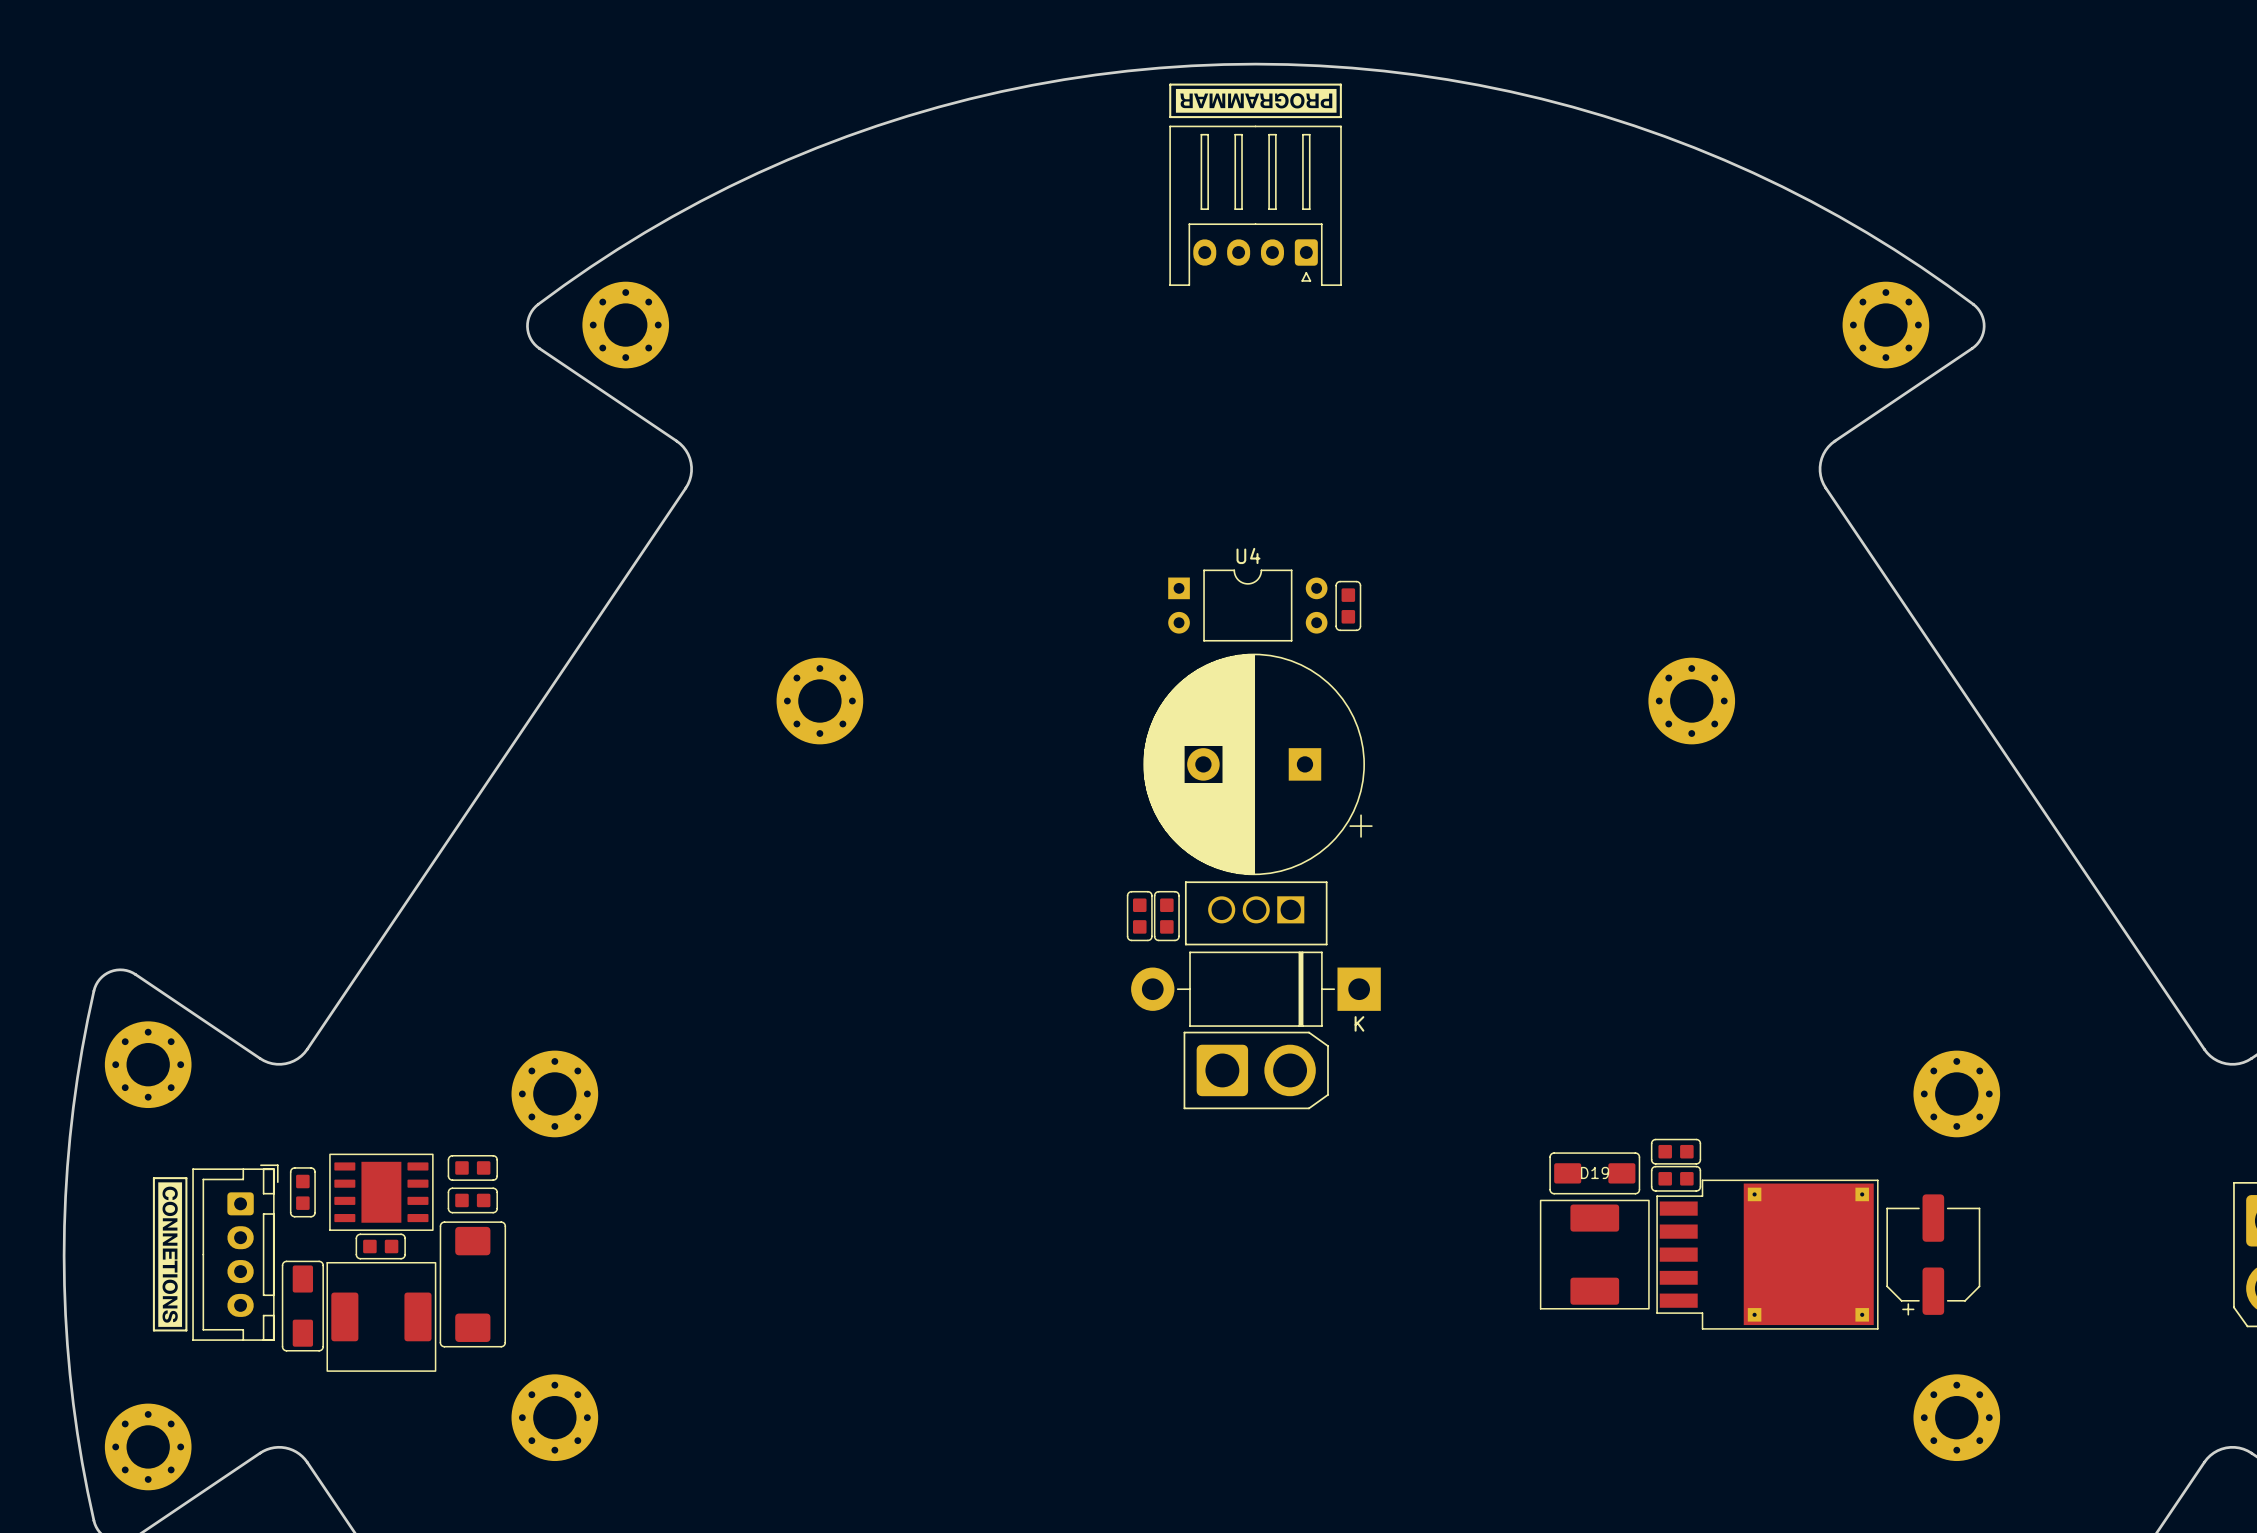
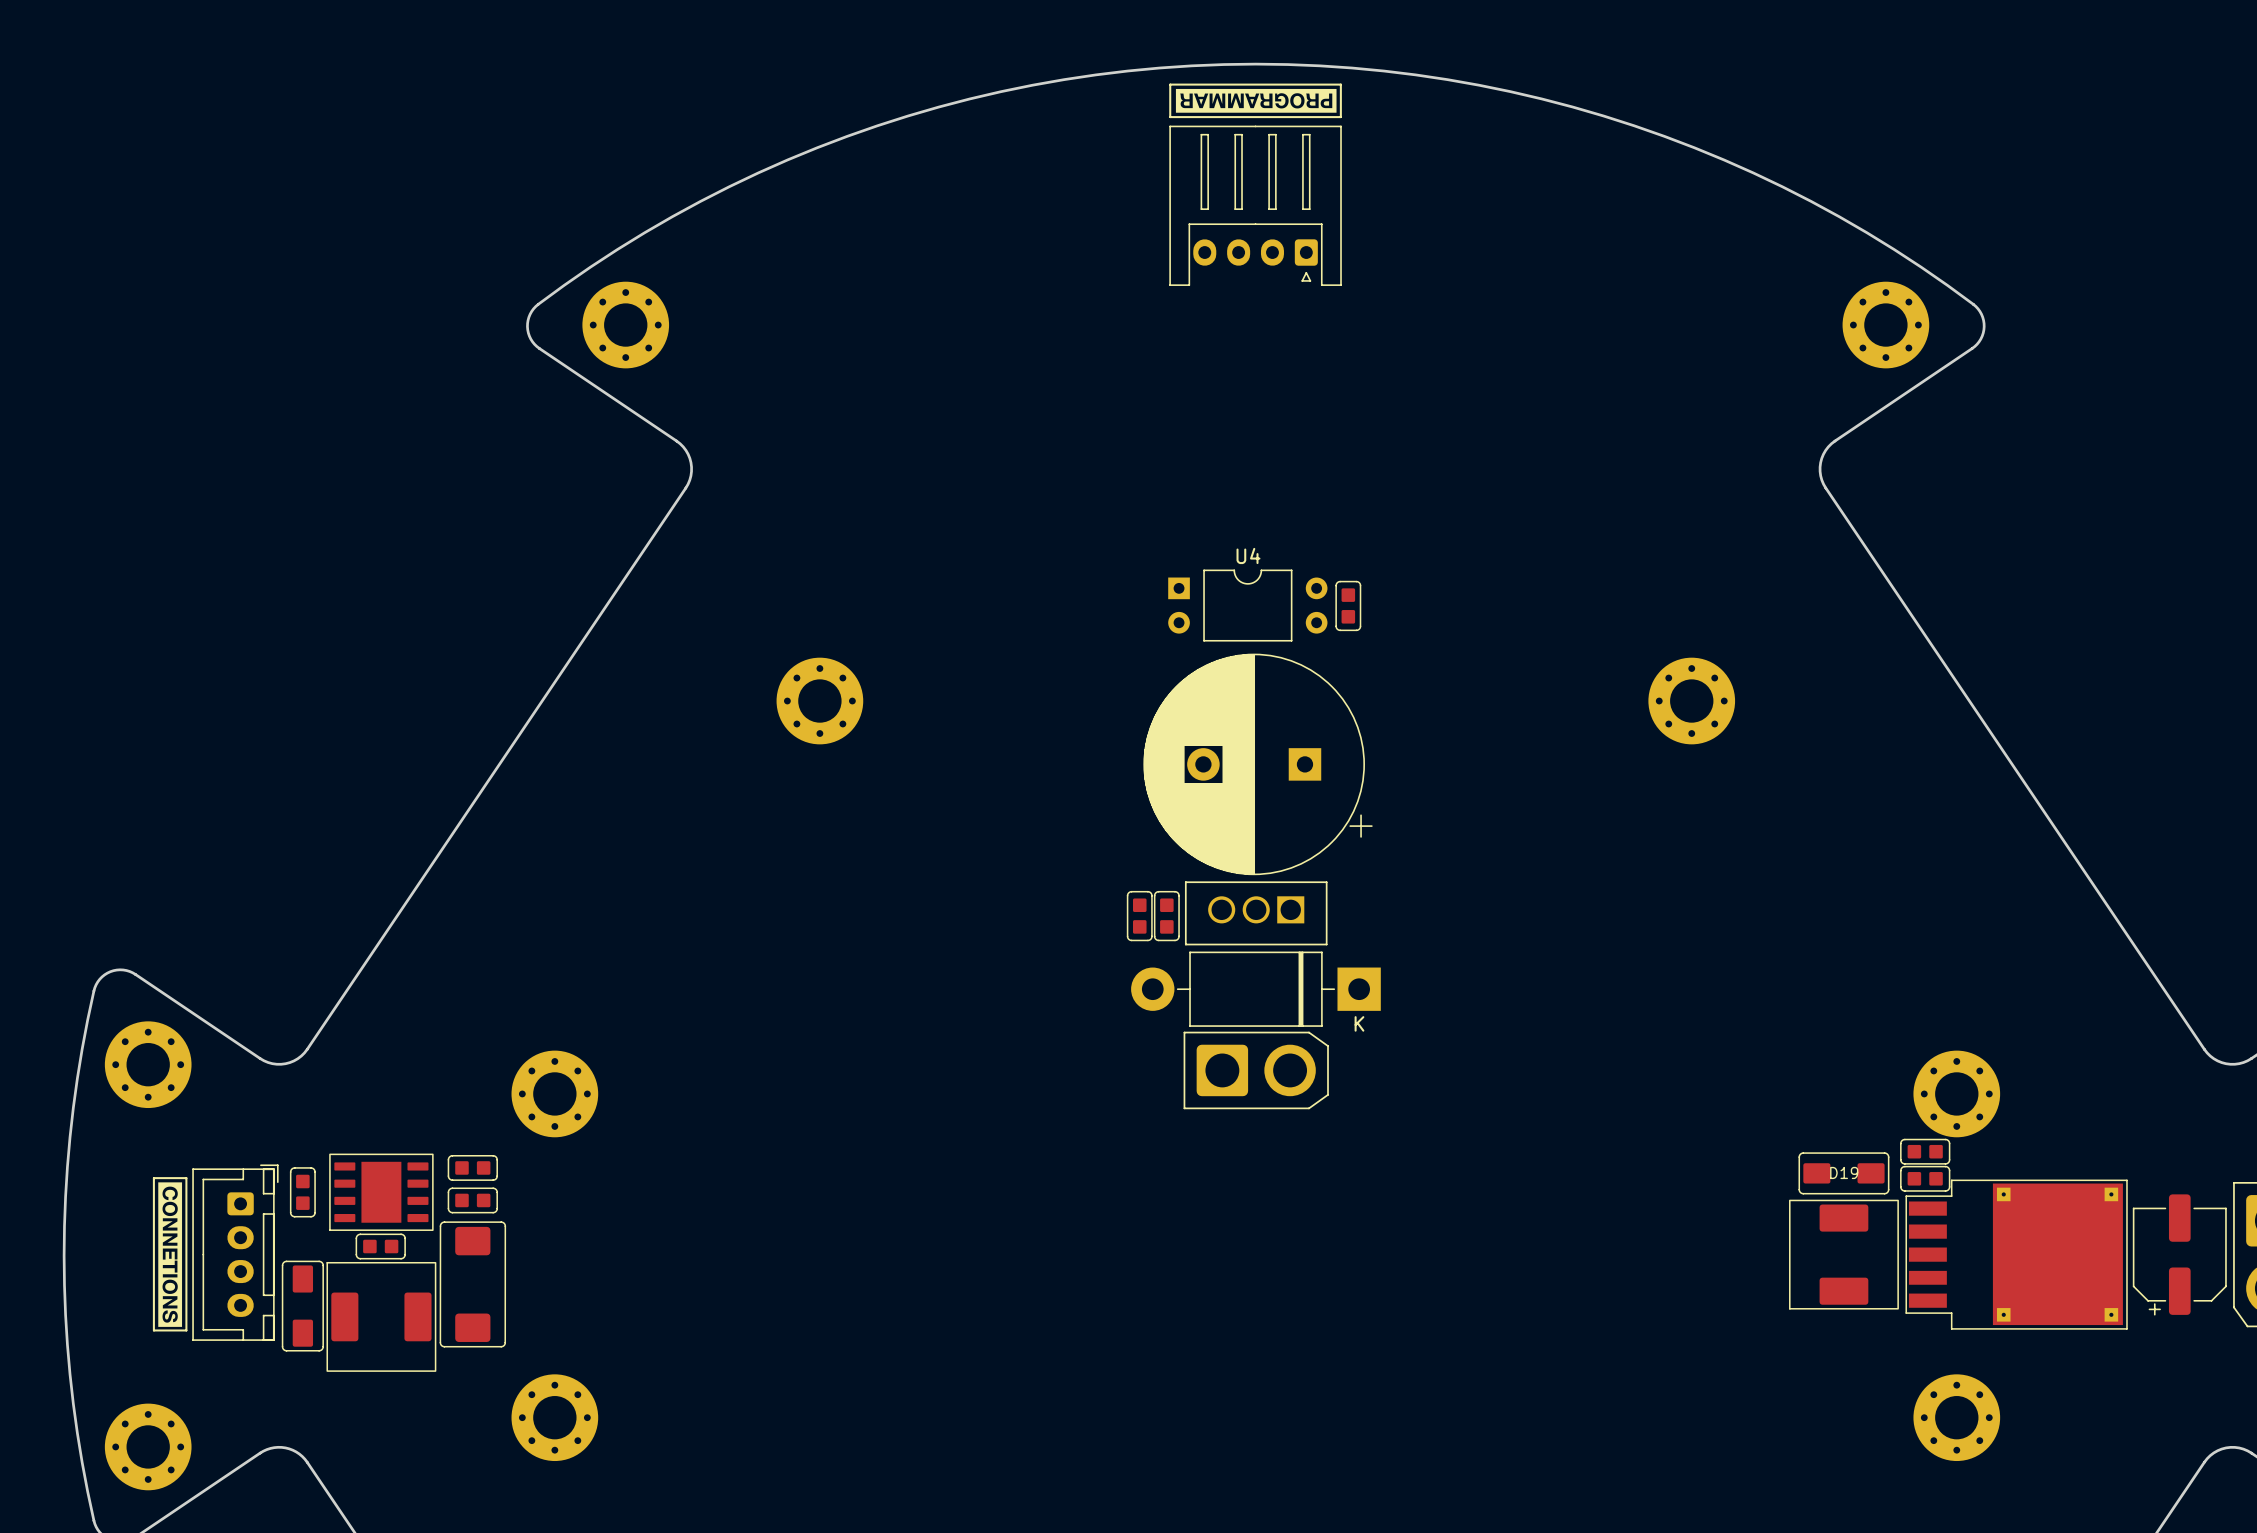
part: (1676, 1151) -> none
part: none -> (1925, 1151)
D19 position: (1594, 1173) -> (1843, 1173)
part: (1676, 1178) -> none
part: none -> (1925, 1178)
part position: (1594, 1254) -> (1843, 1254)
part position: (1767, 1254) -> (2016, 1254)
part position: (1933, 1254) -> (2179, 1254)

